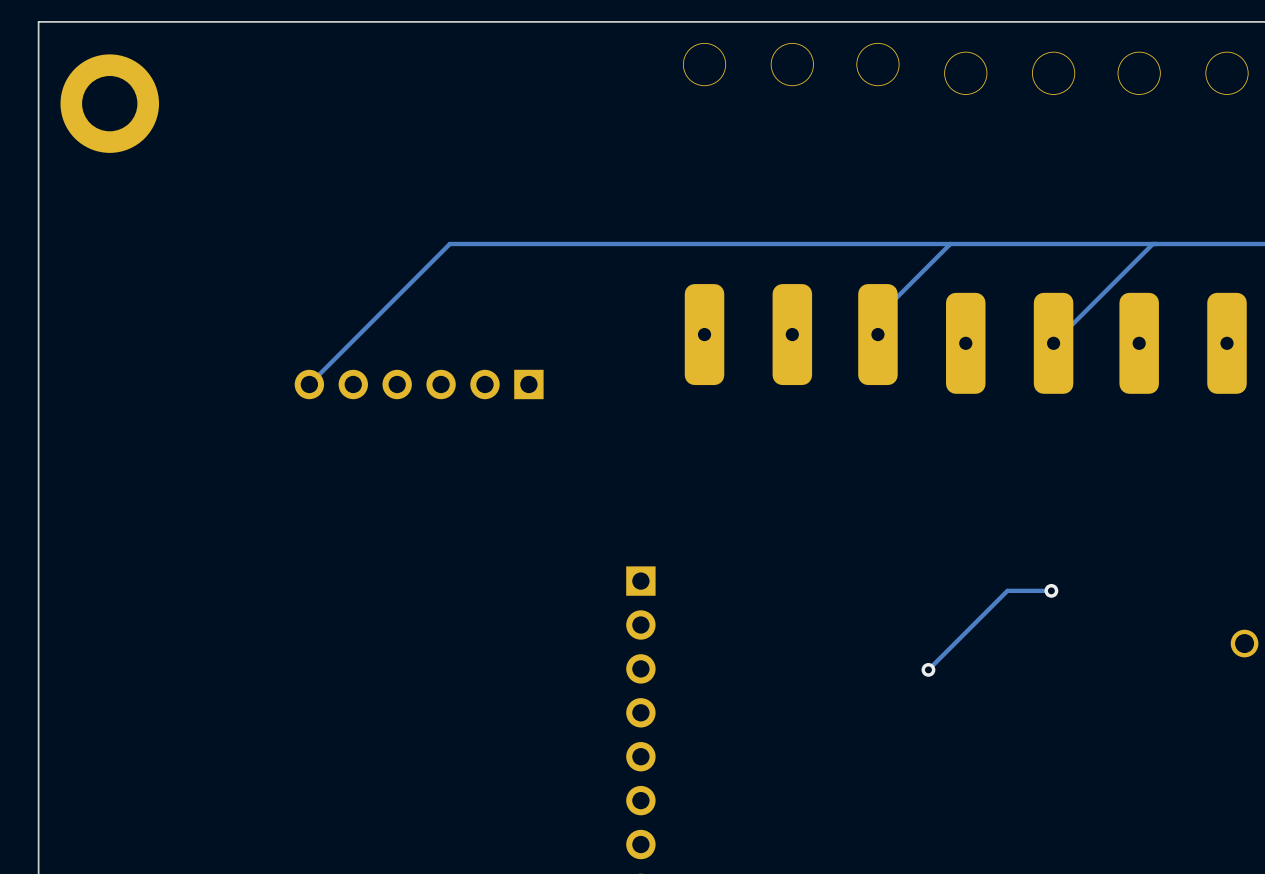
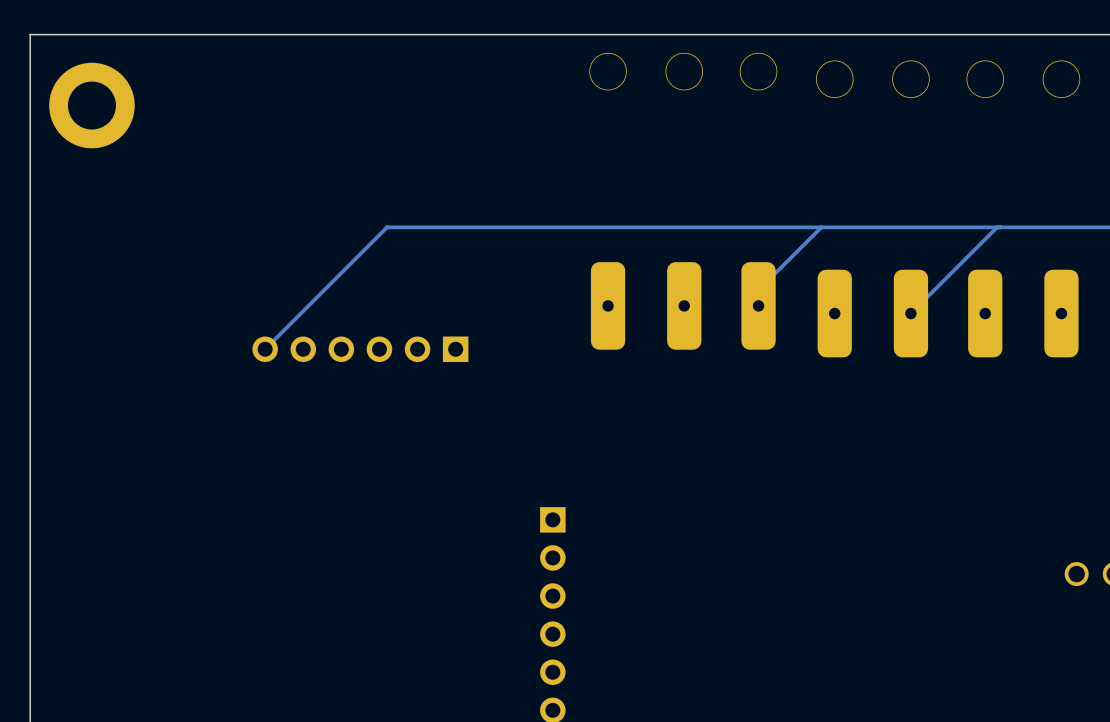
track: (1051, 590) (1007, 590) (928, 669) -> none
via: (1051, 590) -> none
via: (928, 669) -> none

